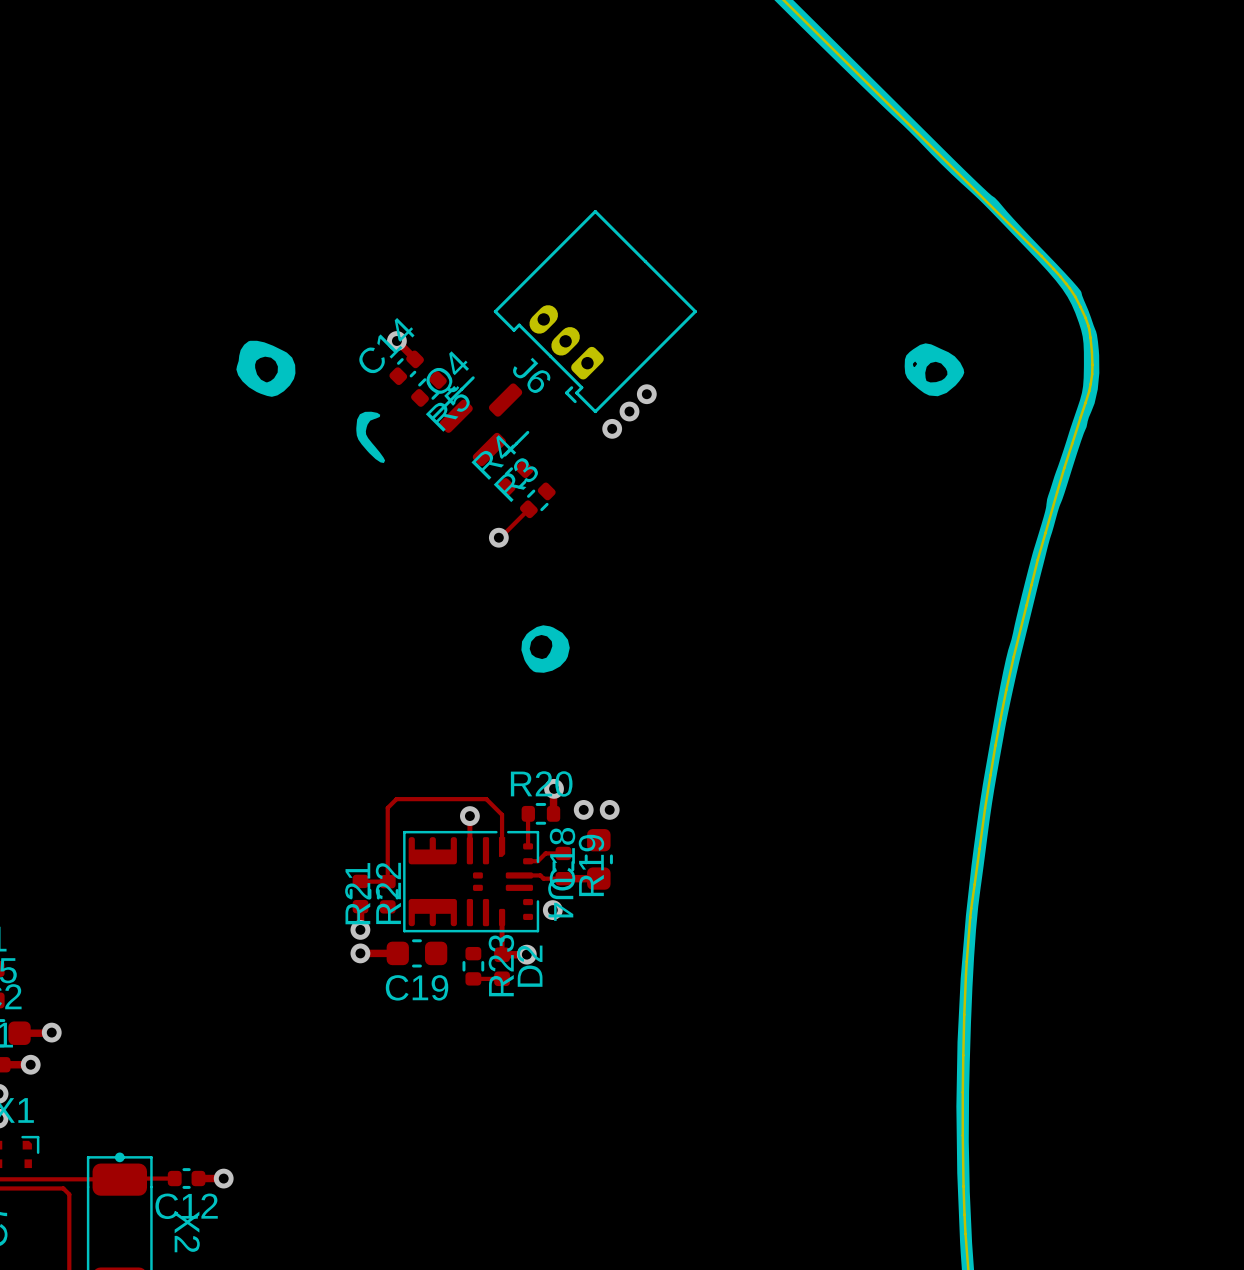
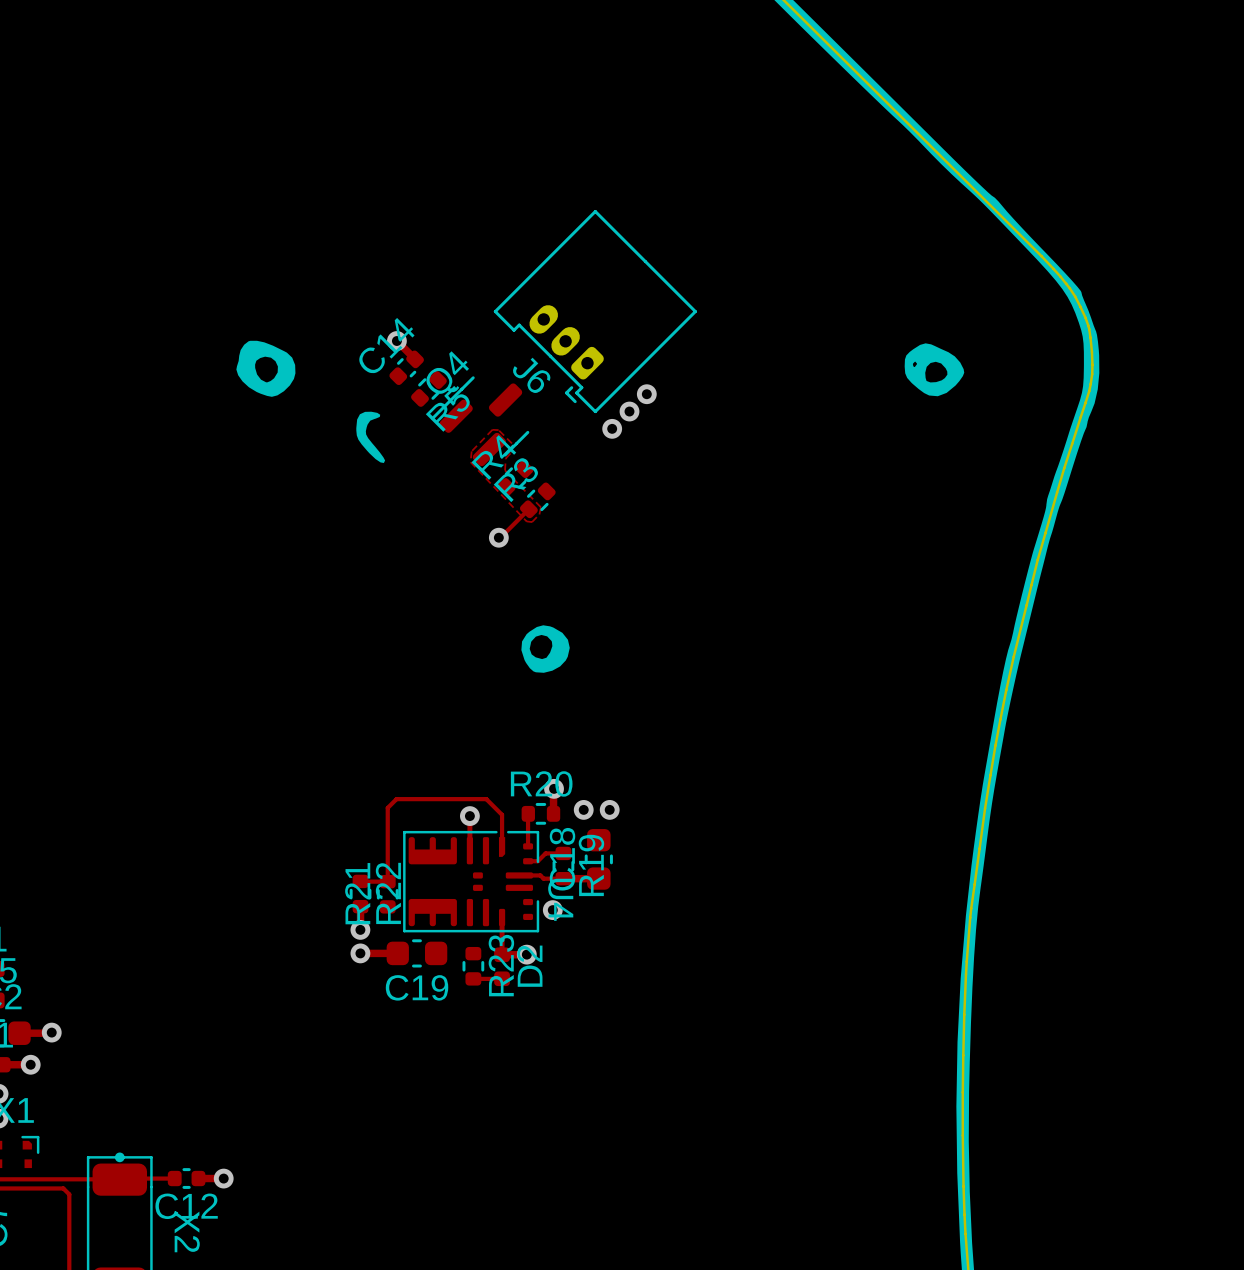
zone outline: none -> (492, 429) (498, 430) (511, 443) (511, 452) (505, 458) (505, 470) (540, 507) (539, 514) (532, 522) (526, 521) (470, 462) (471, 451) (492, 429)

